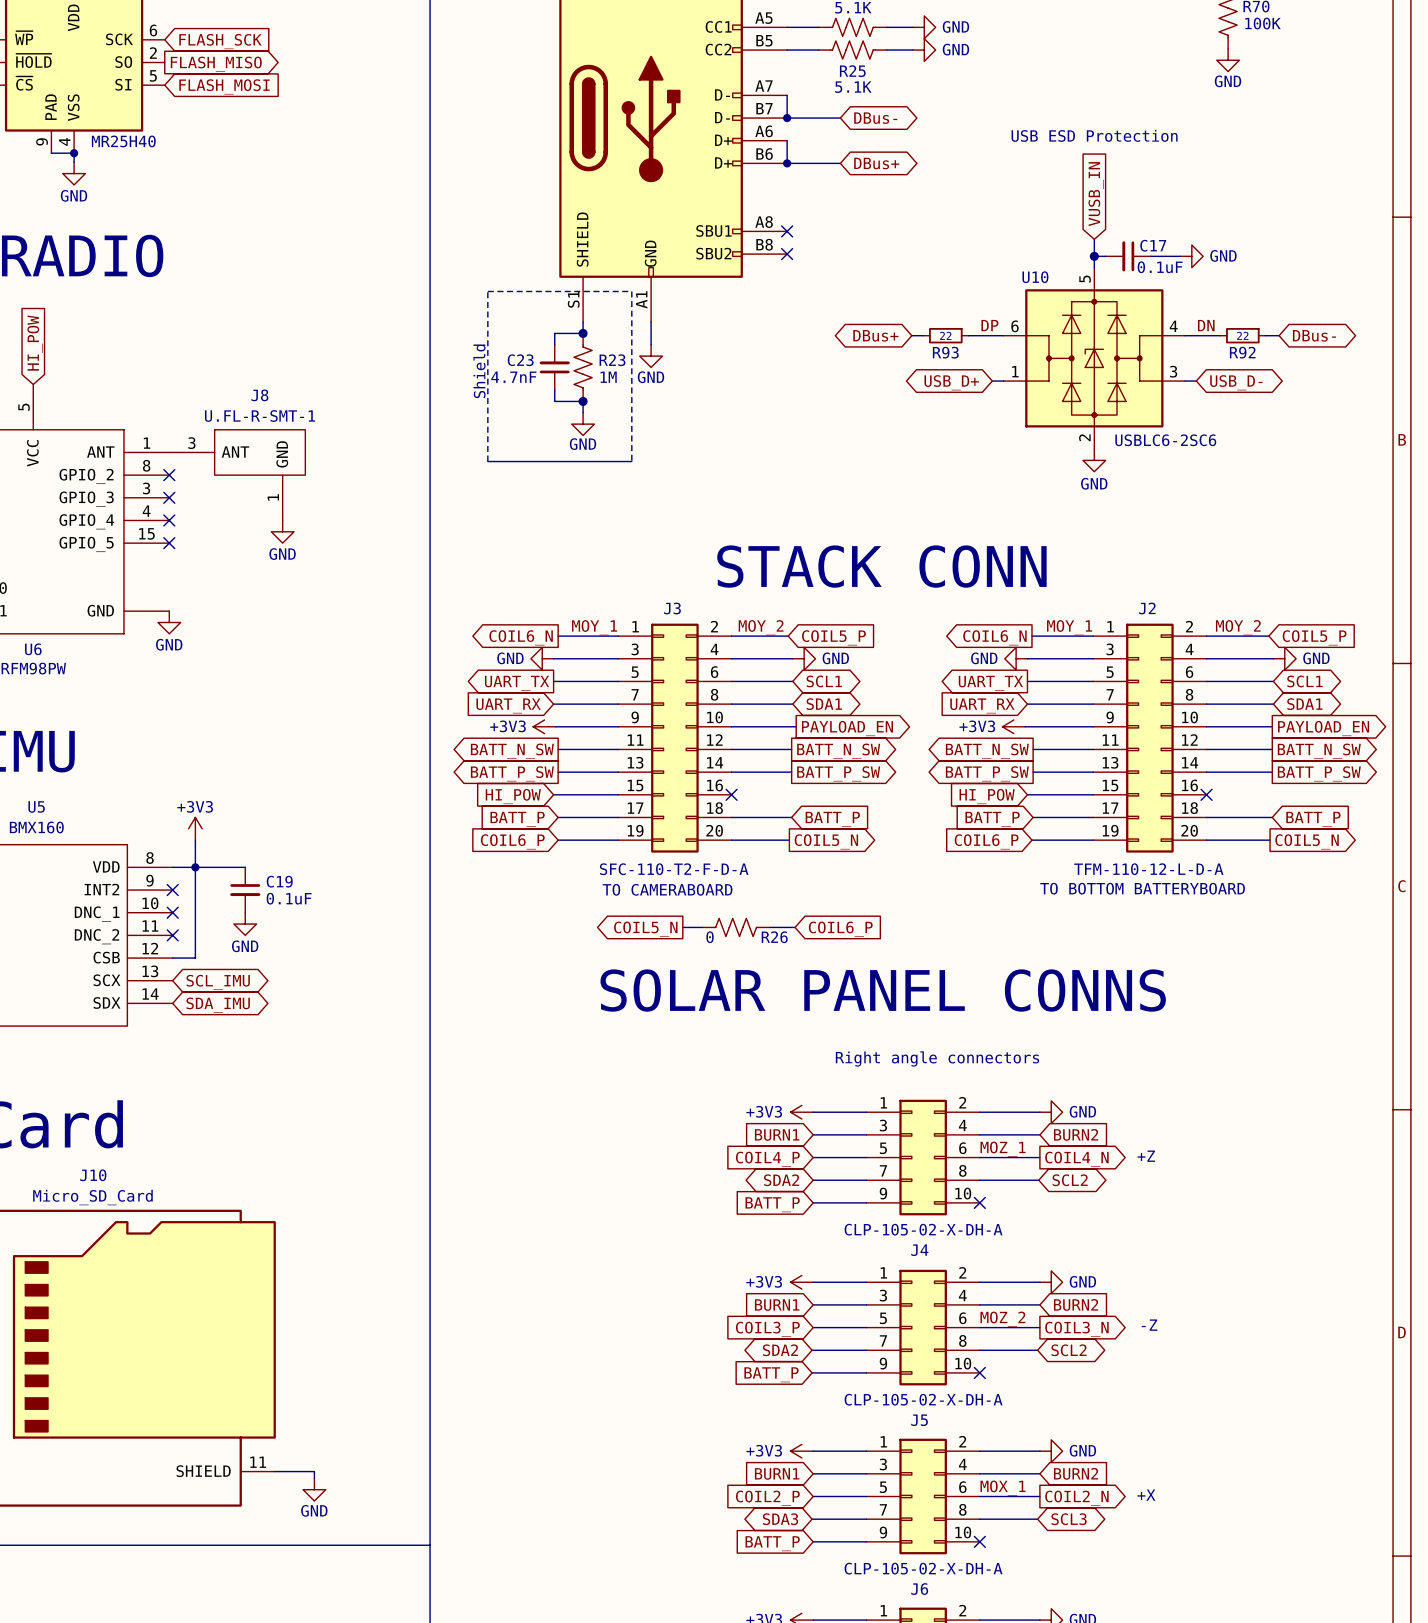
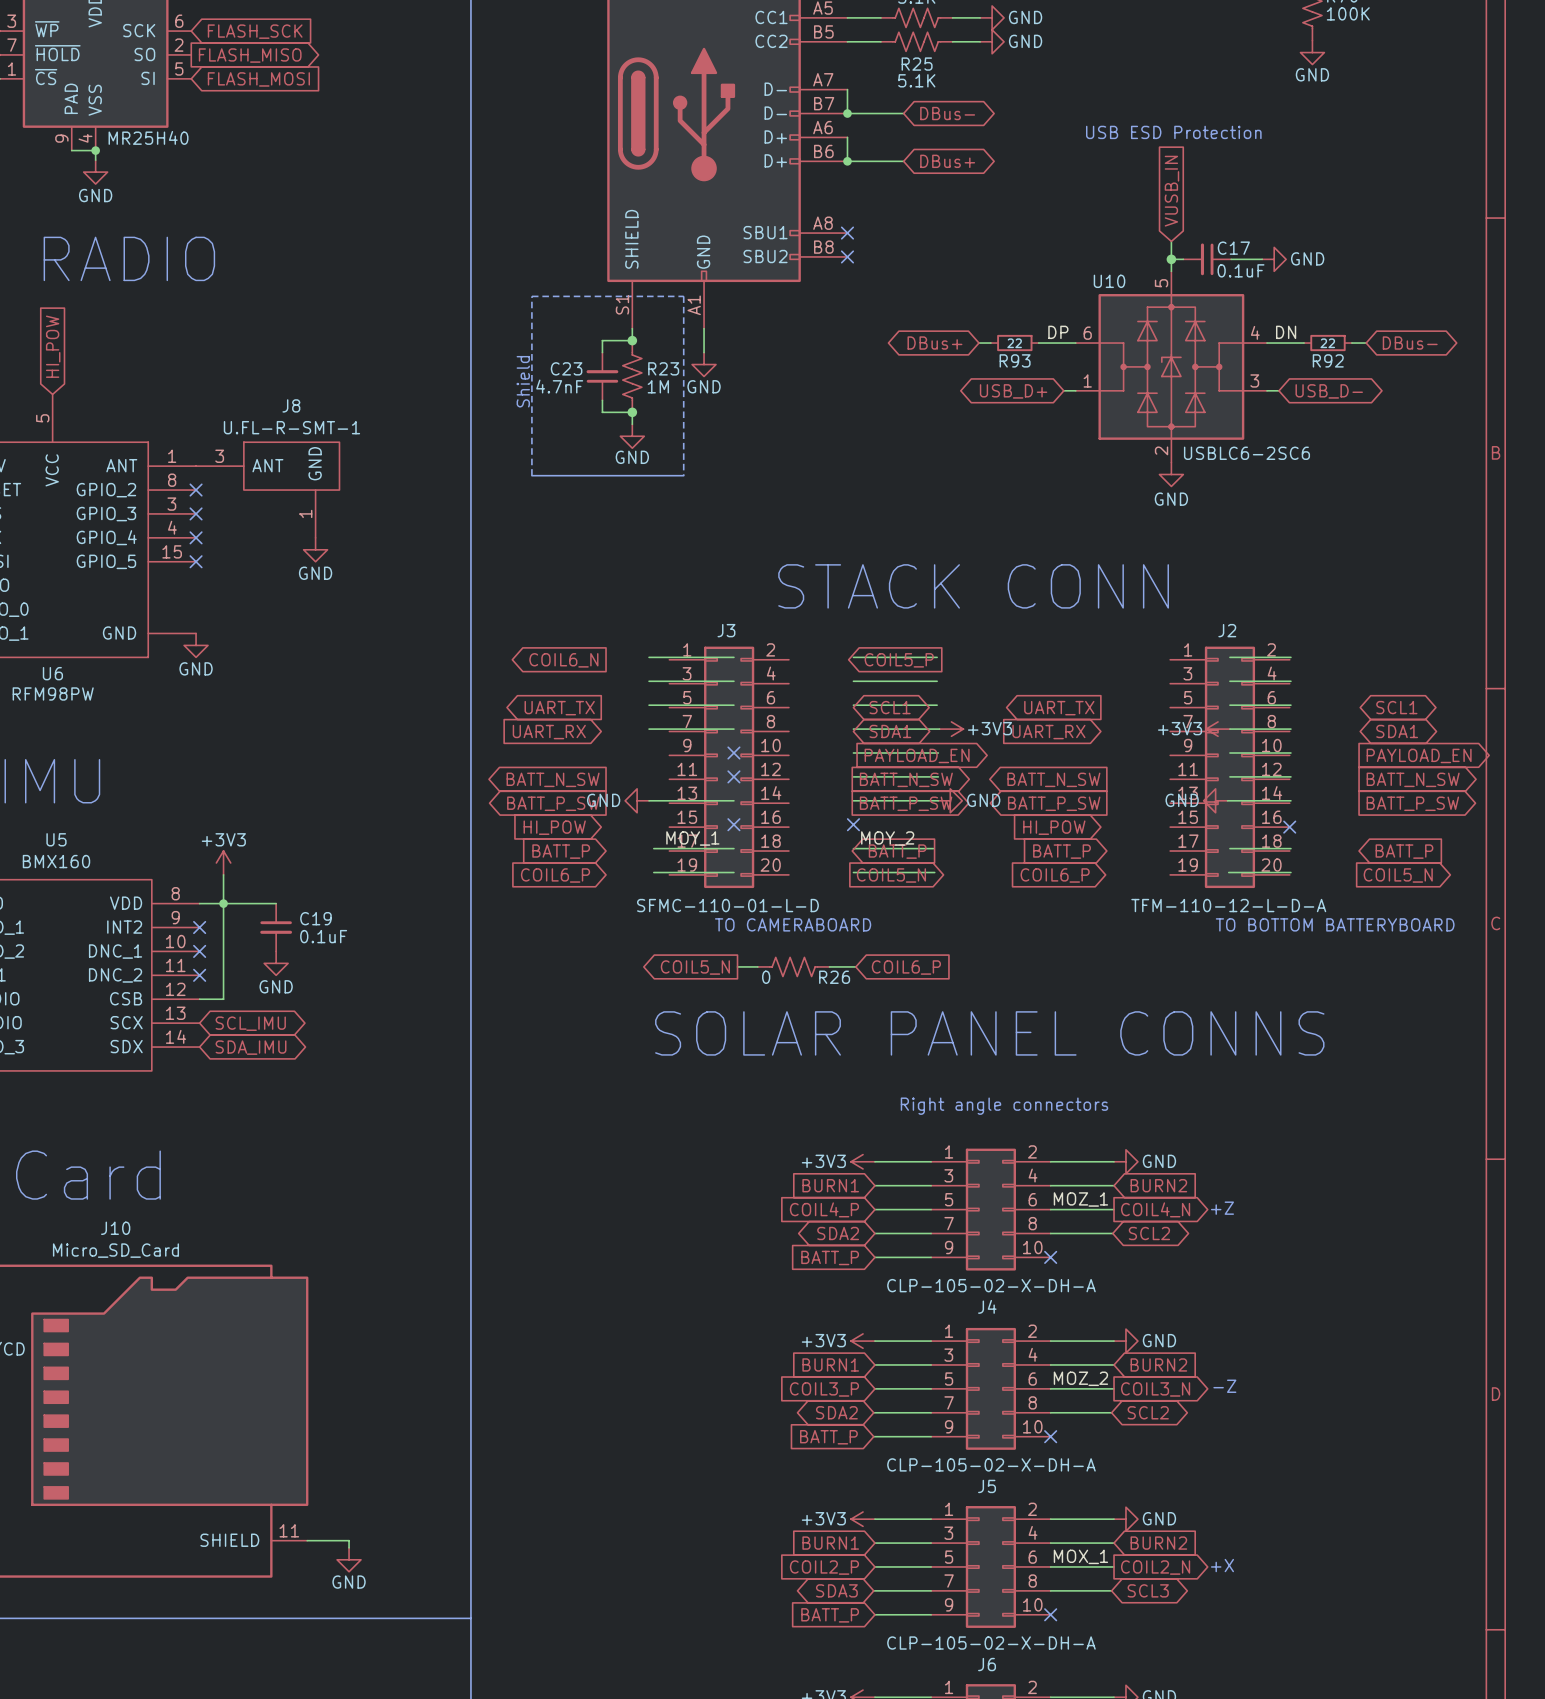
label position: MOY_1 (594, 627) -> MOY_1 (692, 838)
label position: MOY_2 (761, 627) -> MOY_2 (887, 838)
label: MOY_1 (1069, 627) -> none
label: MOY_2 (1238, 627) -> none
wire: none -> (649, 657) (733, 657)
wire: none -> (853, 657) (937, 657)
wire: none -> (1229, 657) (1290, 657)
wire: (558, 636) (618, 636) -> none
wire: (731, 636) (788, 636) -> none
wire: (1031, 636) (1093, 636) -> none
wire: (1206, 636) (1268, 636) -> none
global label: COIL6_N (994, 637) -> none
global label: COIL5_P (1314, 637) -> none
wire: none -> (649, 681) (733, 681)
wire: none -> (853, 681) (937, 681)
wire: none -> (1229, 681) (1290, 681)
power symbol position: GND (542, 658) -> GND (637, 800)
wire: (553, 658) (618, 658) -> none
wire: (731, 658) (792, 658) -> none
power symbol: GND (804, 658) -> none
power symbol: GND (1016, 658) -> none
wire: (1027, 658) (1093, 658) -> none
wire: (1206, 658) (1273, 658) -> none
power symbol: GND (1284, 658) -> none
wire: none -> (649, 705) (733, 705)
wire: none -> (853, 705) (937, 705)
wire: none -> (1229, 705) (1290, 705)
wire: (553, 681) (618, 681) -> none
wire: (731, 681) (792, 681) -> none
wire: (1027, 681) (1093, 681) -> none
wire: (1206, 681) (1273, 681) -> none
wire: none -> (649, 729) (733, 729)
wire: none -> (853, 729) (939, 729)
power symbol: none -> +3V3 (951, 729)
power symbol: none -> +3V3 (1218, 729)
wire: none -> (1229, 729) (1290, 729)
wire: (553, 704) (618, 704) -> none
wire: (731, 704) (792, 704) -> none
wire: (1027, 704) (1093, 704) -> none
wire: (1206, 704) (1273, 704) -> none
no-connect mark: none -> (733, 753)
wire: none -> (853, 753) (938, 753)
wire: none -> (1229, 753) (1290, 753)
power symbol: +3V3 (544, 726) -> none
wire: (555, 726) (618, 726) -> none
wire: (731, 726) (796, 726) -> none
power symbol: +3V3 (1013, 726) -> none
wire: (1025, 726) (1093, 726) -> none
wire: (1206, 726) (1272, 726) -> none
no-connect mark: none -> (733, 776)
wire: none -> (853, 776) (938, 776)
wire: none -> (1229, 776) (1290, 776)
wire: (558, 749) (618, 749) -> none
wire: (731, 749) (791, 749) -> none
wire: (1033, 749) (1093, 749) -> none
wire: (1206, 749) (1272, 749) -> none
wire: none -> (649, 800) (733, 800)
wire: none -> (853, 800) (938, 800)
power symbol: none -> GND (950, 800)
power symbol: none -> GND (1215, 800)
wire: (558, 772) (618, 772) -> none
wire: (731, 772) (791, 772) -> none
wire: (1033, 772) (1093, 772) -> (1227, 800) (1290, 800)
wire: (1206, 772) (1272, 772) -> none
no-connect mark: none -> (733, 824)
no-connect mark: none -> (853, 824)
wire: (553, 794) (618, 794) -> none
no-connect mark: (731, 794) -> none
wire: (1027, 794) (1093, 794) -> none
wire: none -> (653, 848) (733, 848)
wire: none -> (853, 848) (933, 848)
wire: none -> (1229, 848) (1290, 848)
wire: (558, 817) (618, 817) -> none
wire: (731, 817) (791, 817) -> none
wire: (1033, 817) (1093, 817) -> none
wire: (1206, 817) (1272, 817) -> none
wire: none -> (653, 872) (733, 872)
wire: none -> (853, 872) (934, 872)
wire: none -> (1228, 872) (1290, 872)
wire: (558, 840) (618, 840) -> none
wire: (731, 840) (789, 840) -> none
wire: (1031, 840) (1093, 840) -> none
wire: (1206, 840) (1270, 840) -> none
J3 value: SFC-110-T2-F-D-A (674, 869) -> SFMC-110-01-L-D (727, 905)
text position: TO BOTTOM BATTERYBOARD (1142, 888) -> TO BOTTOM BATTERYBOARD (1335, 924)
text position: TO CAMERABOARD (667, 889) -> TO CAMERABOARD (793, 924)

